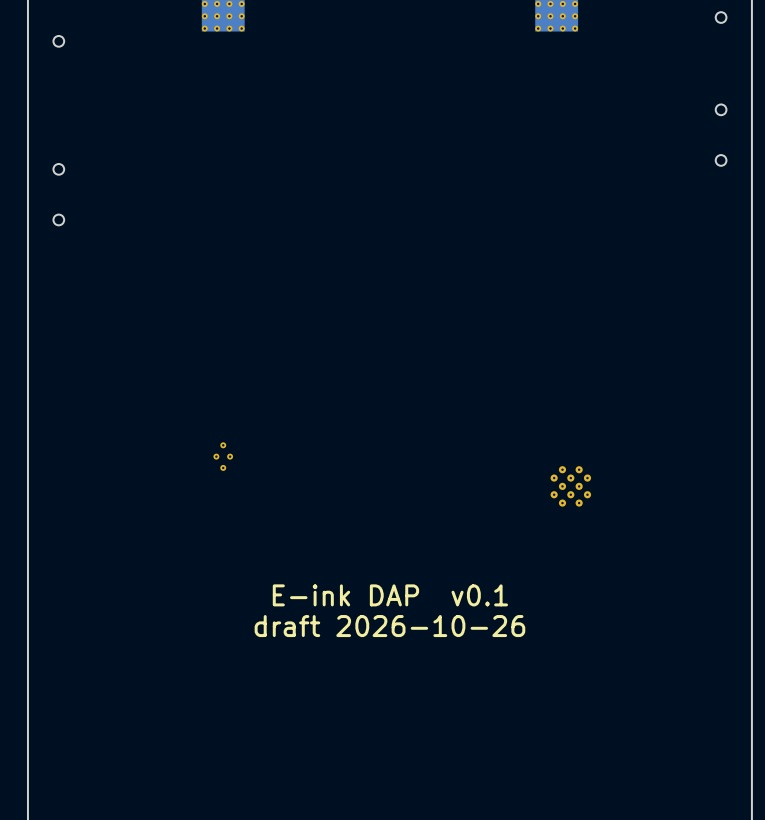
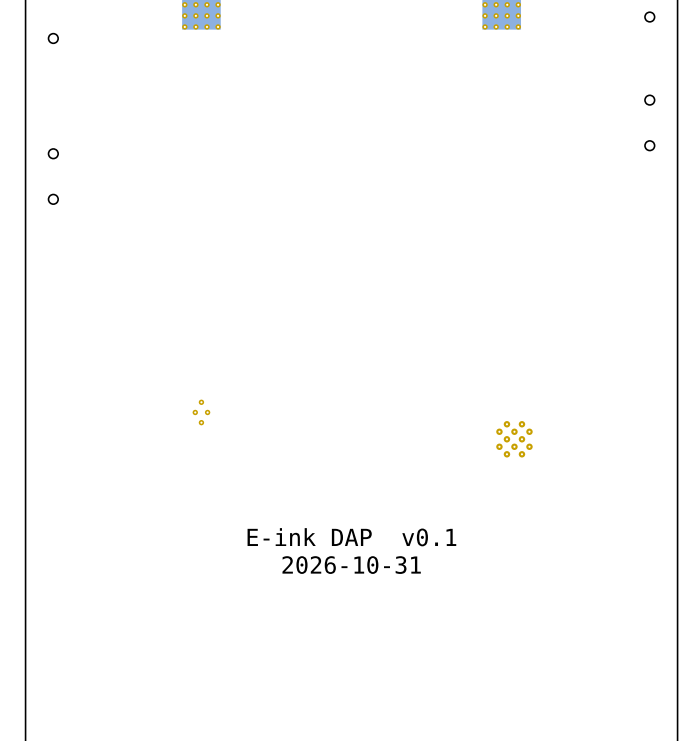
text: draft 2026-10-26 (389, 626) -> 2026-10-31 (351, 565)

